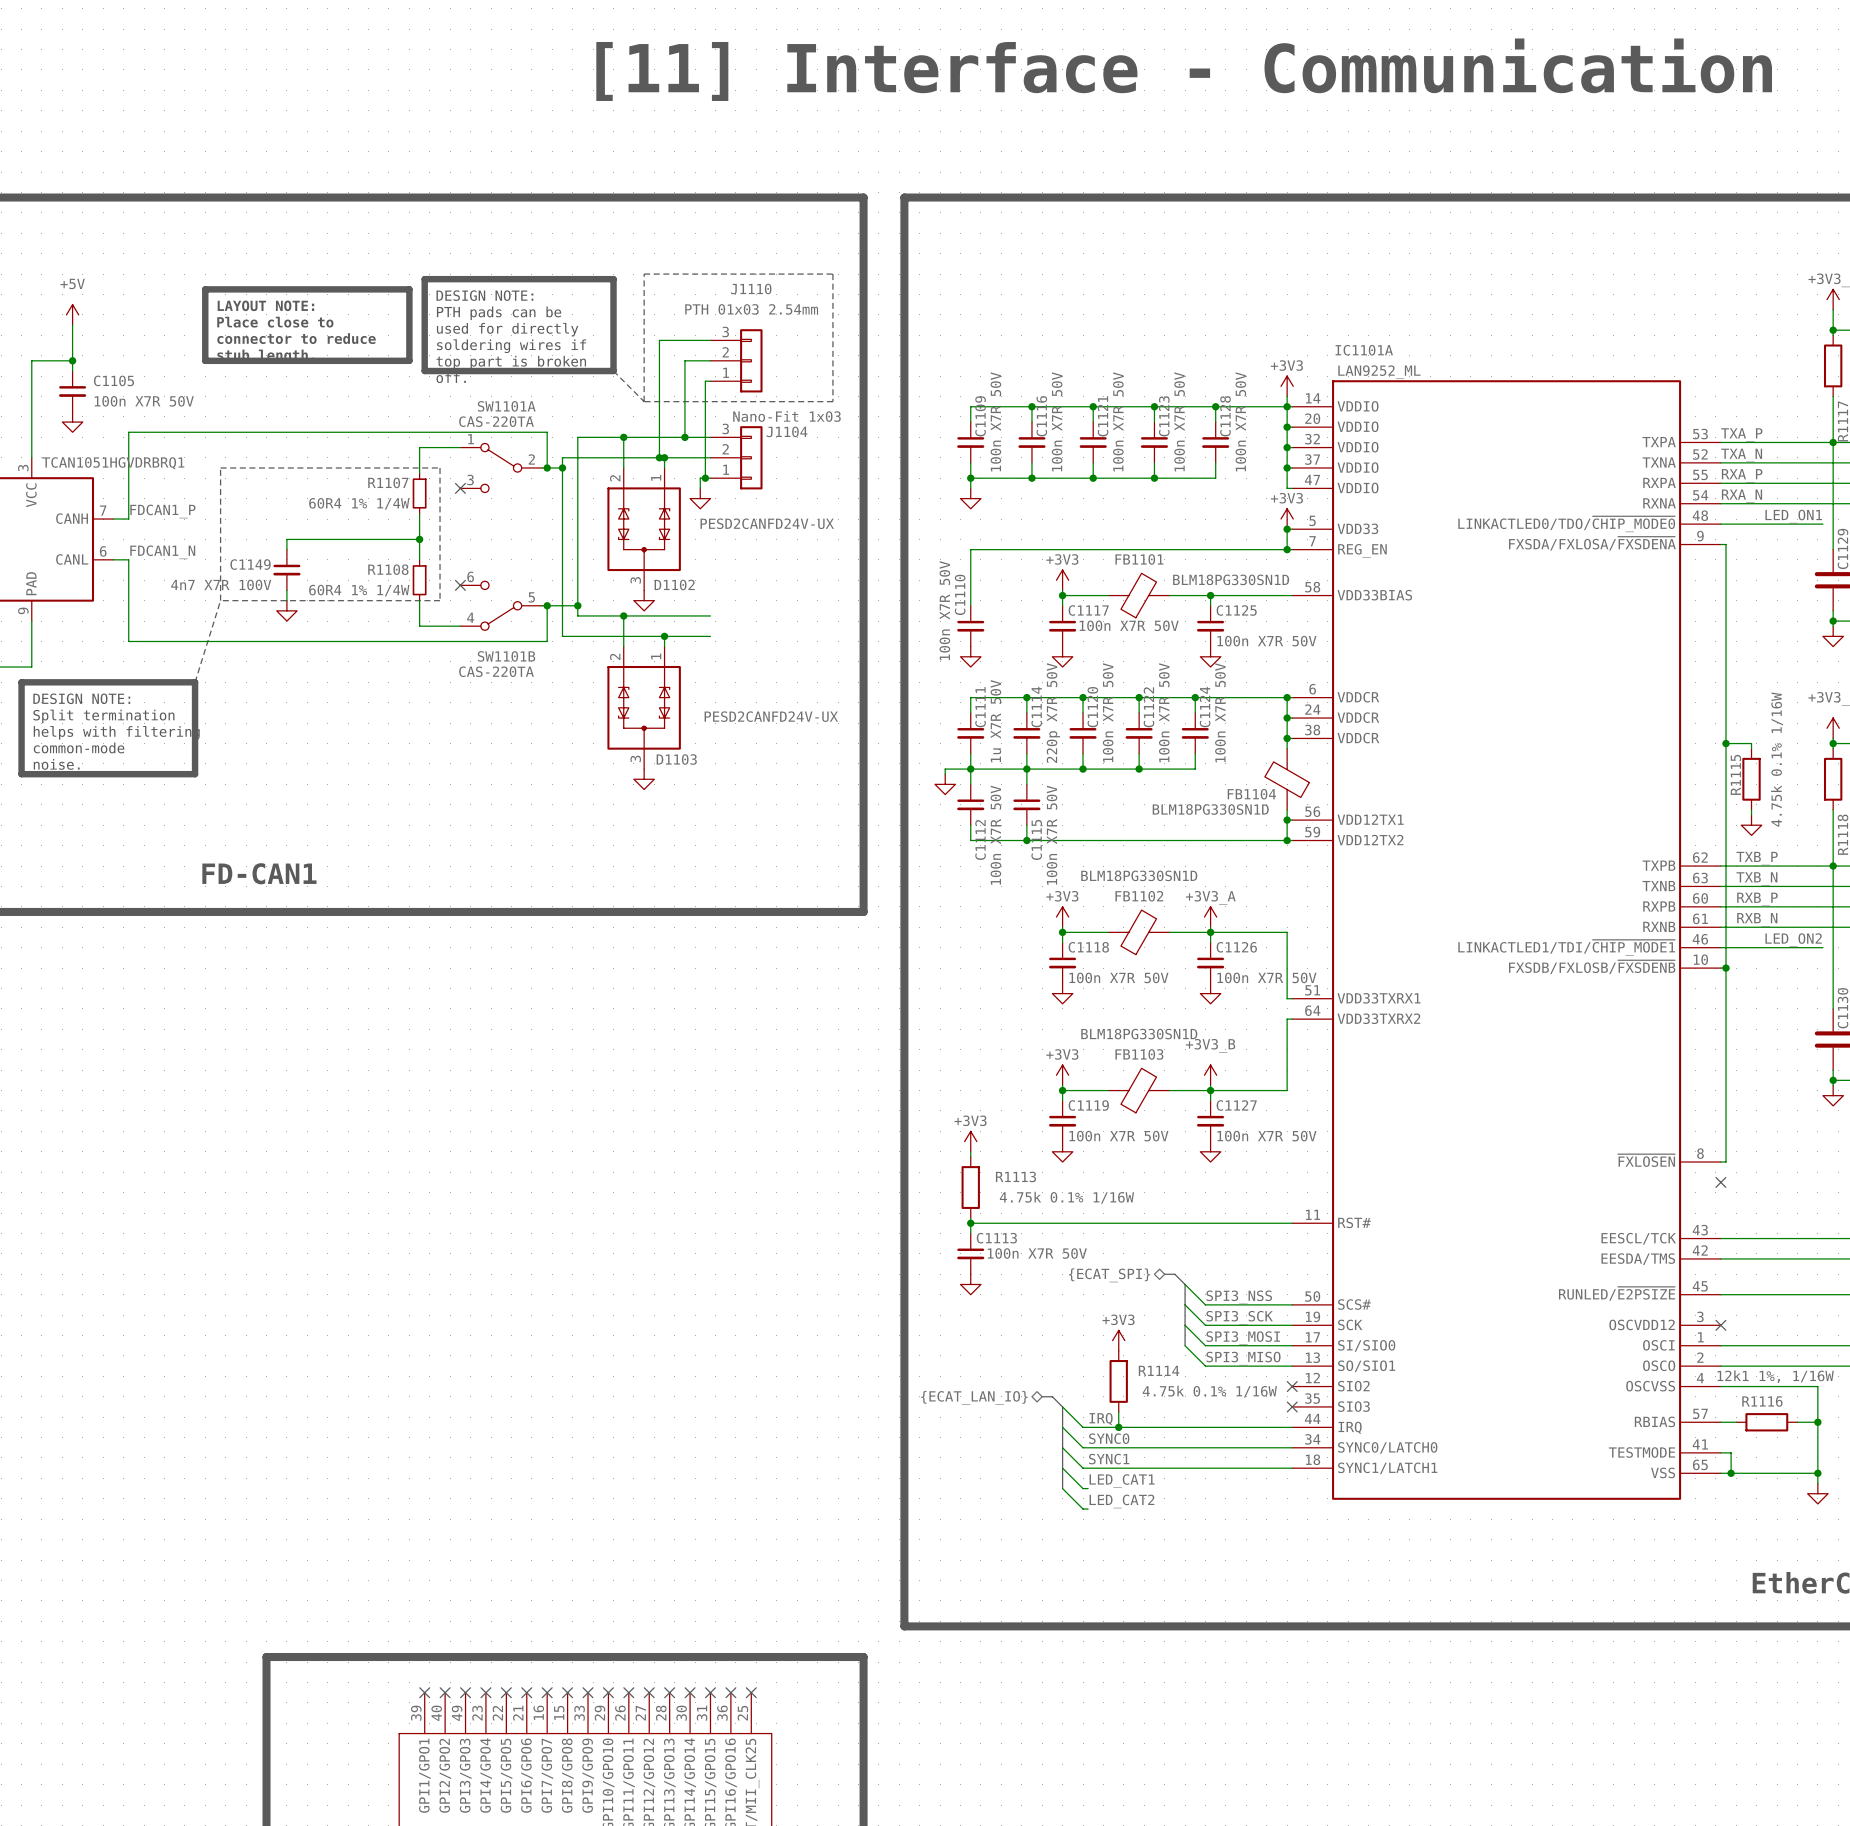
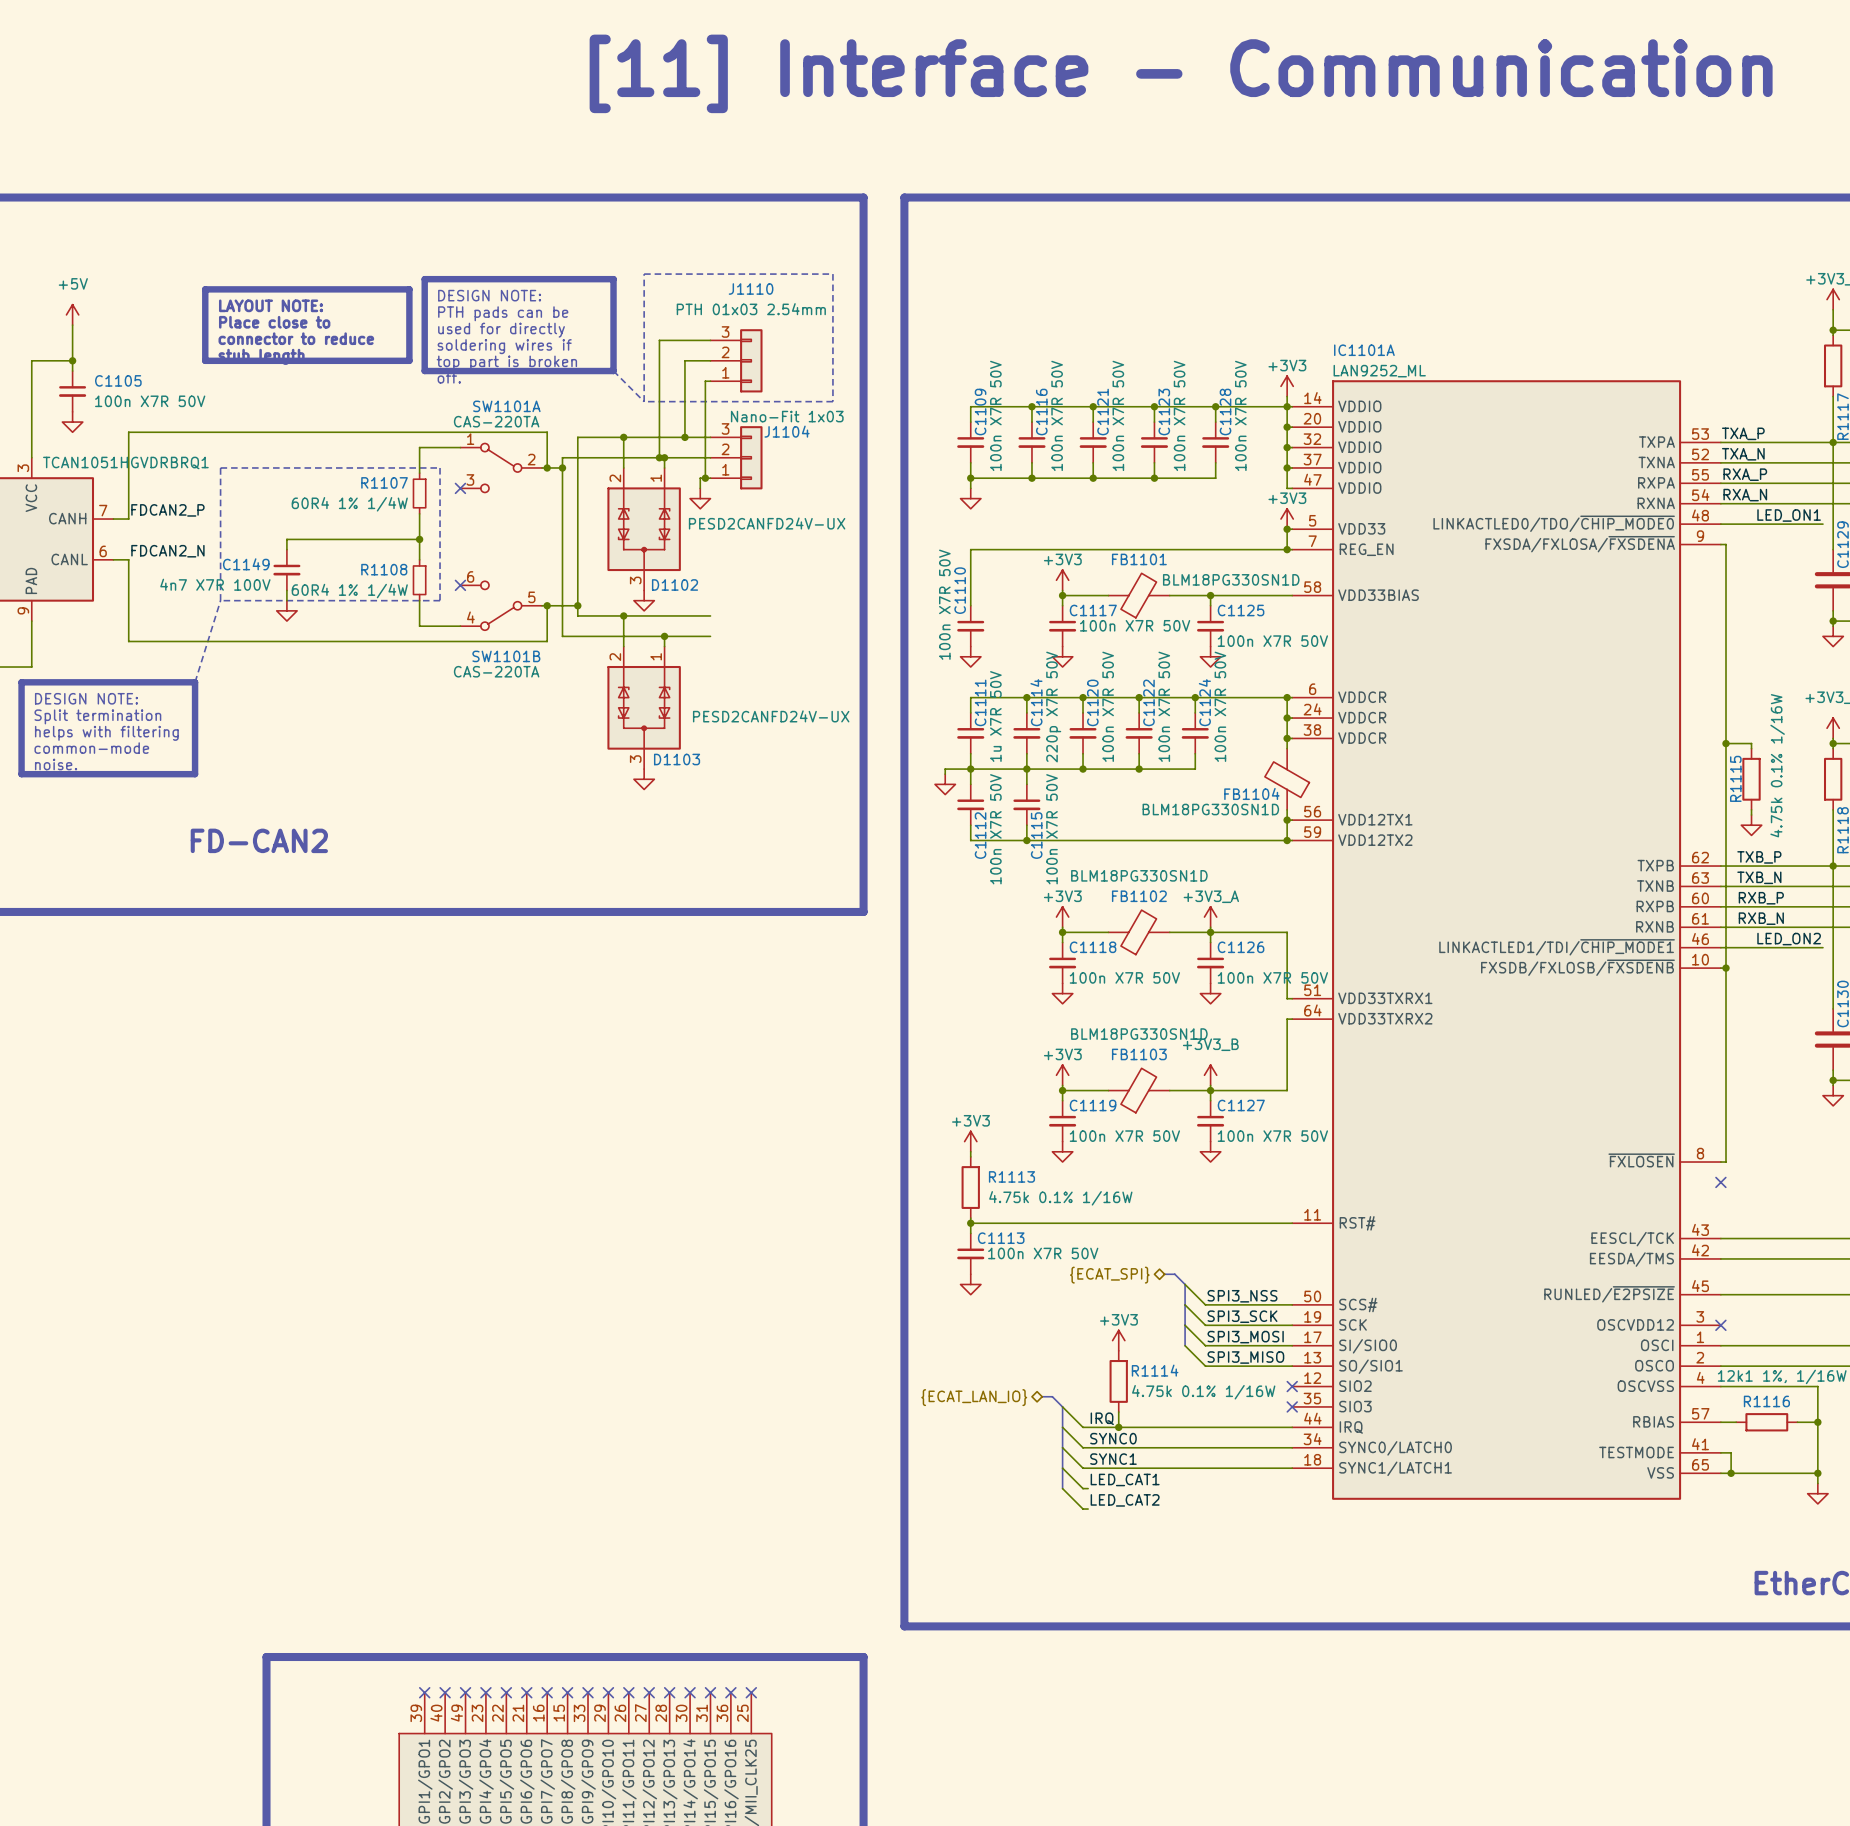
label: FDCAN1_P (162, 511) -> FDCAN2_P (167, 510)
label: FDCAN1_N (162, 552) -> FDCAN2_N (167, 551)
text: FD-CAN1 (259, 873) -> FD-CAN2 (259, 840)

